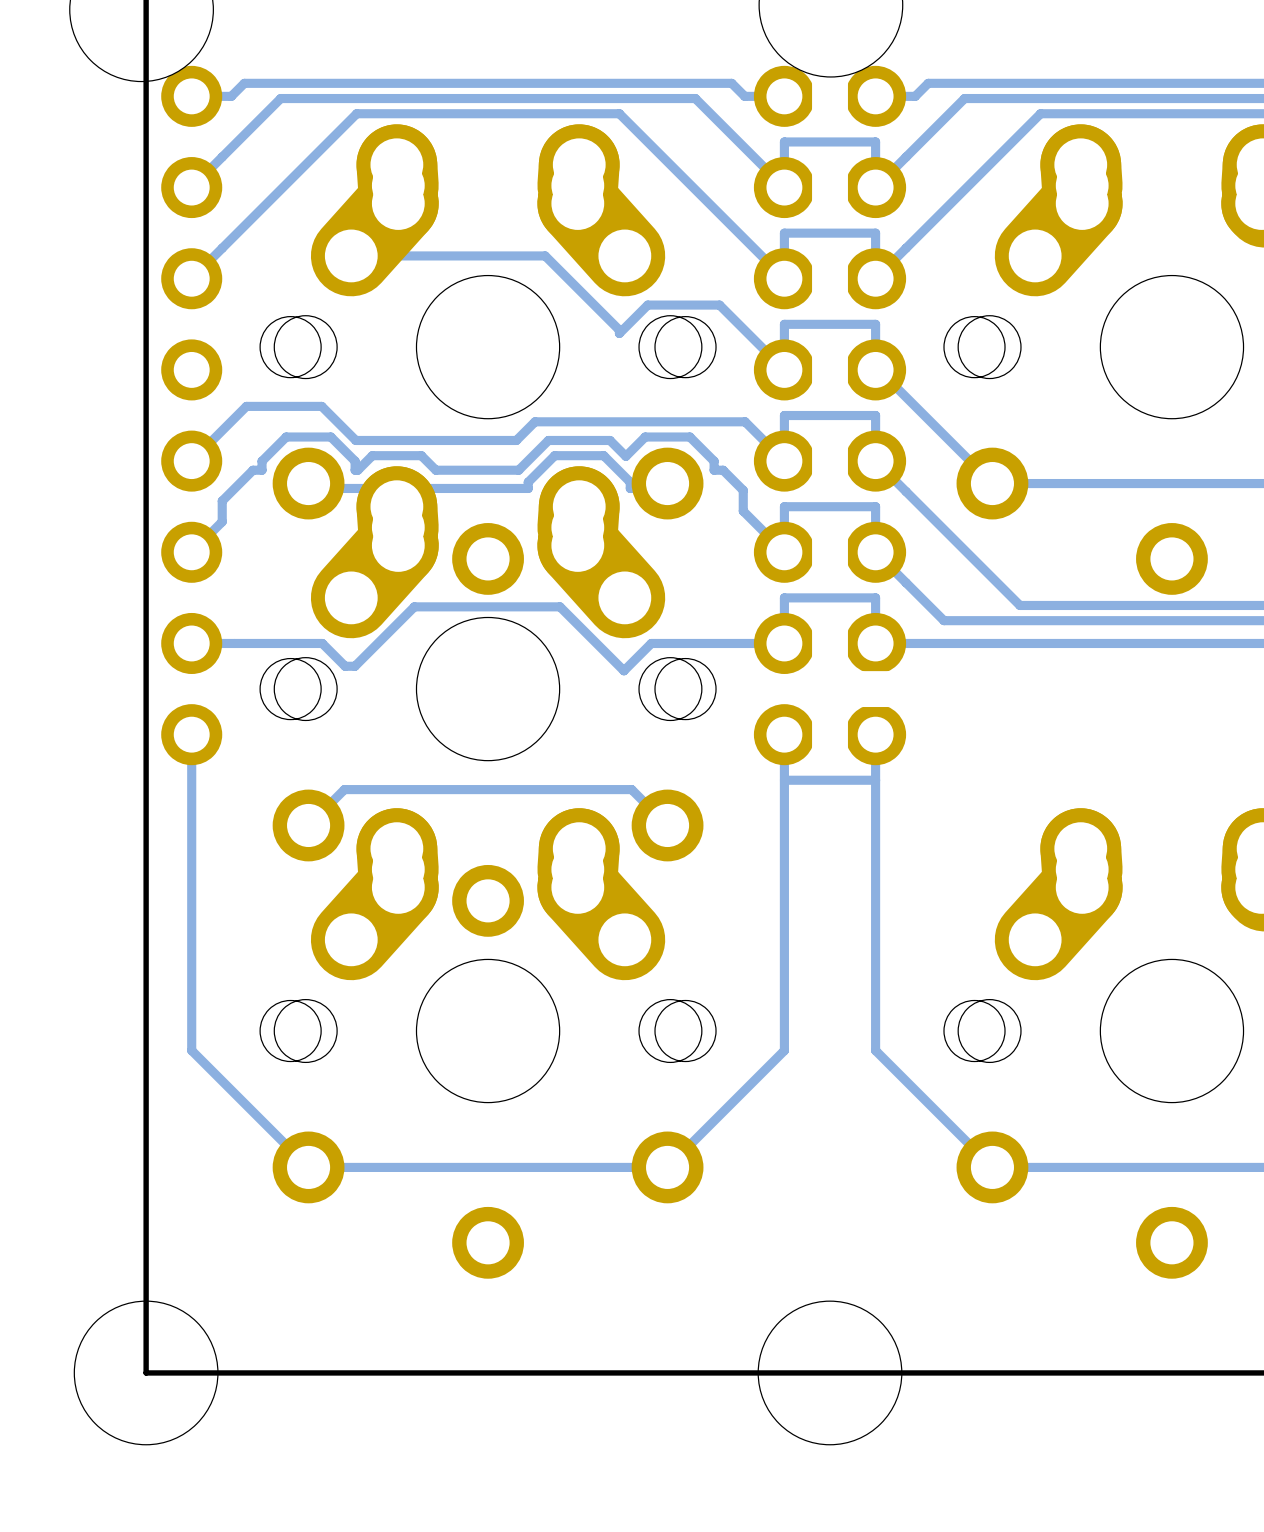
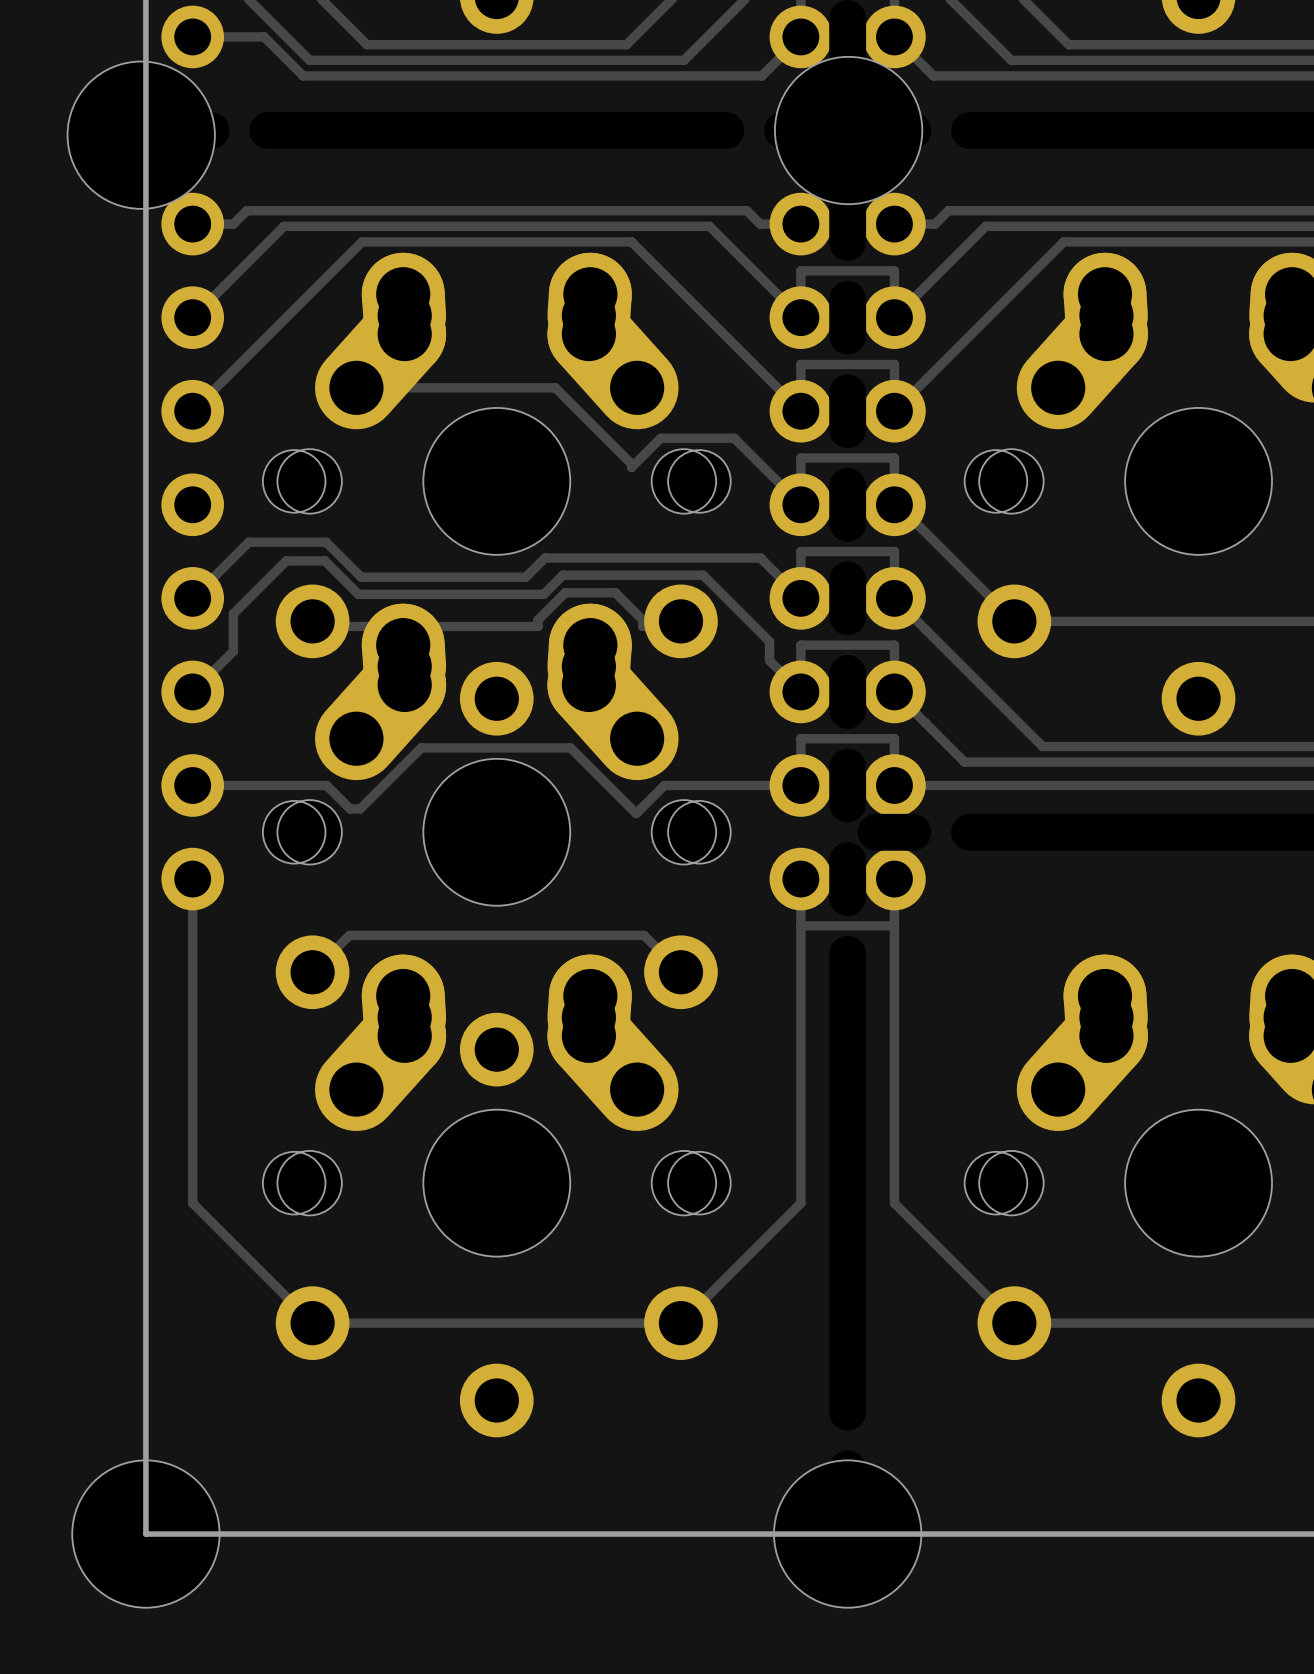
track: (753, 521) (743, 511) (743, 490) (723, 470) (714, 470) (714, 461) (689, 437) (645, 437) (625, 456) (610, 440) (548, 440) (518, 470) (435, 470) (421, 455) (372, 455) (357, 470) (355, 470) (355, 461) (330, 437) (286, 437) (262, 461) (262, 470) (253, 470) (222, 501) (222, 521) -> (769, 660) (769, 641) (703, 575) (562, 575) (543, 594) (358, 594) (325, 560) (286, 560) (233, 613) (233, 651) (224, 660)

